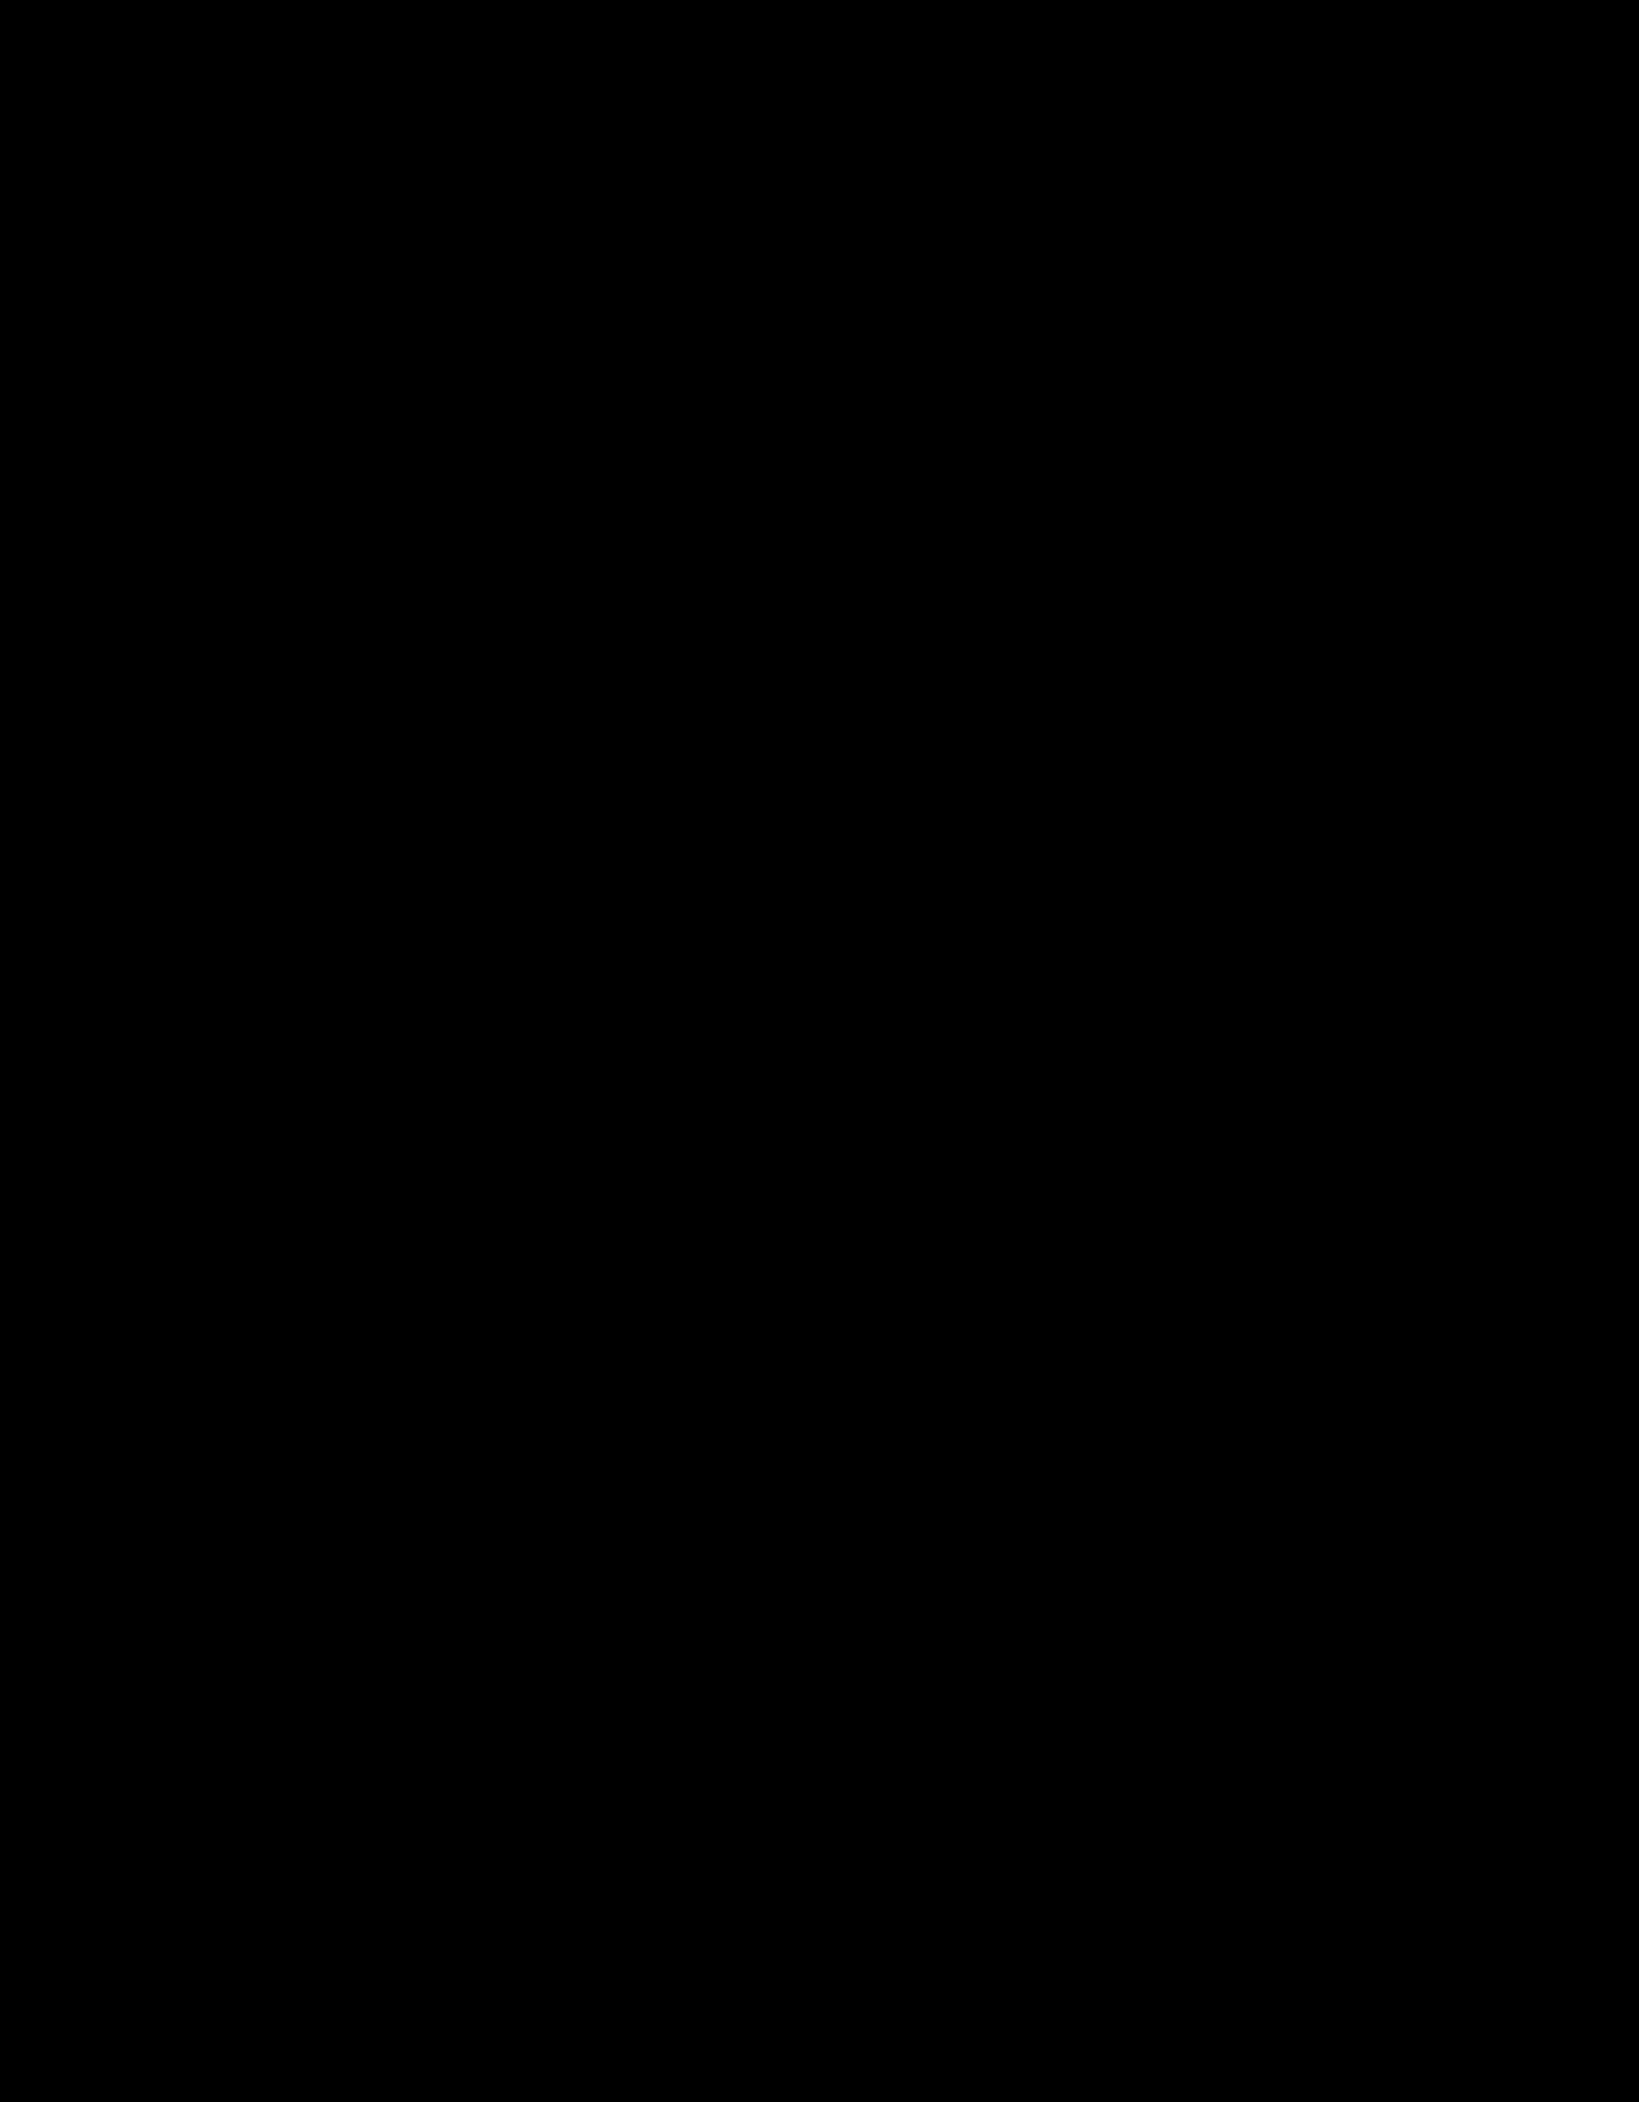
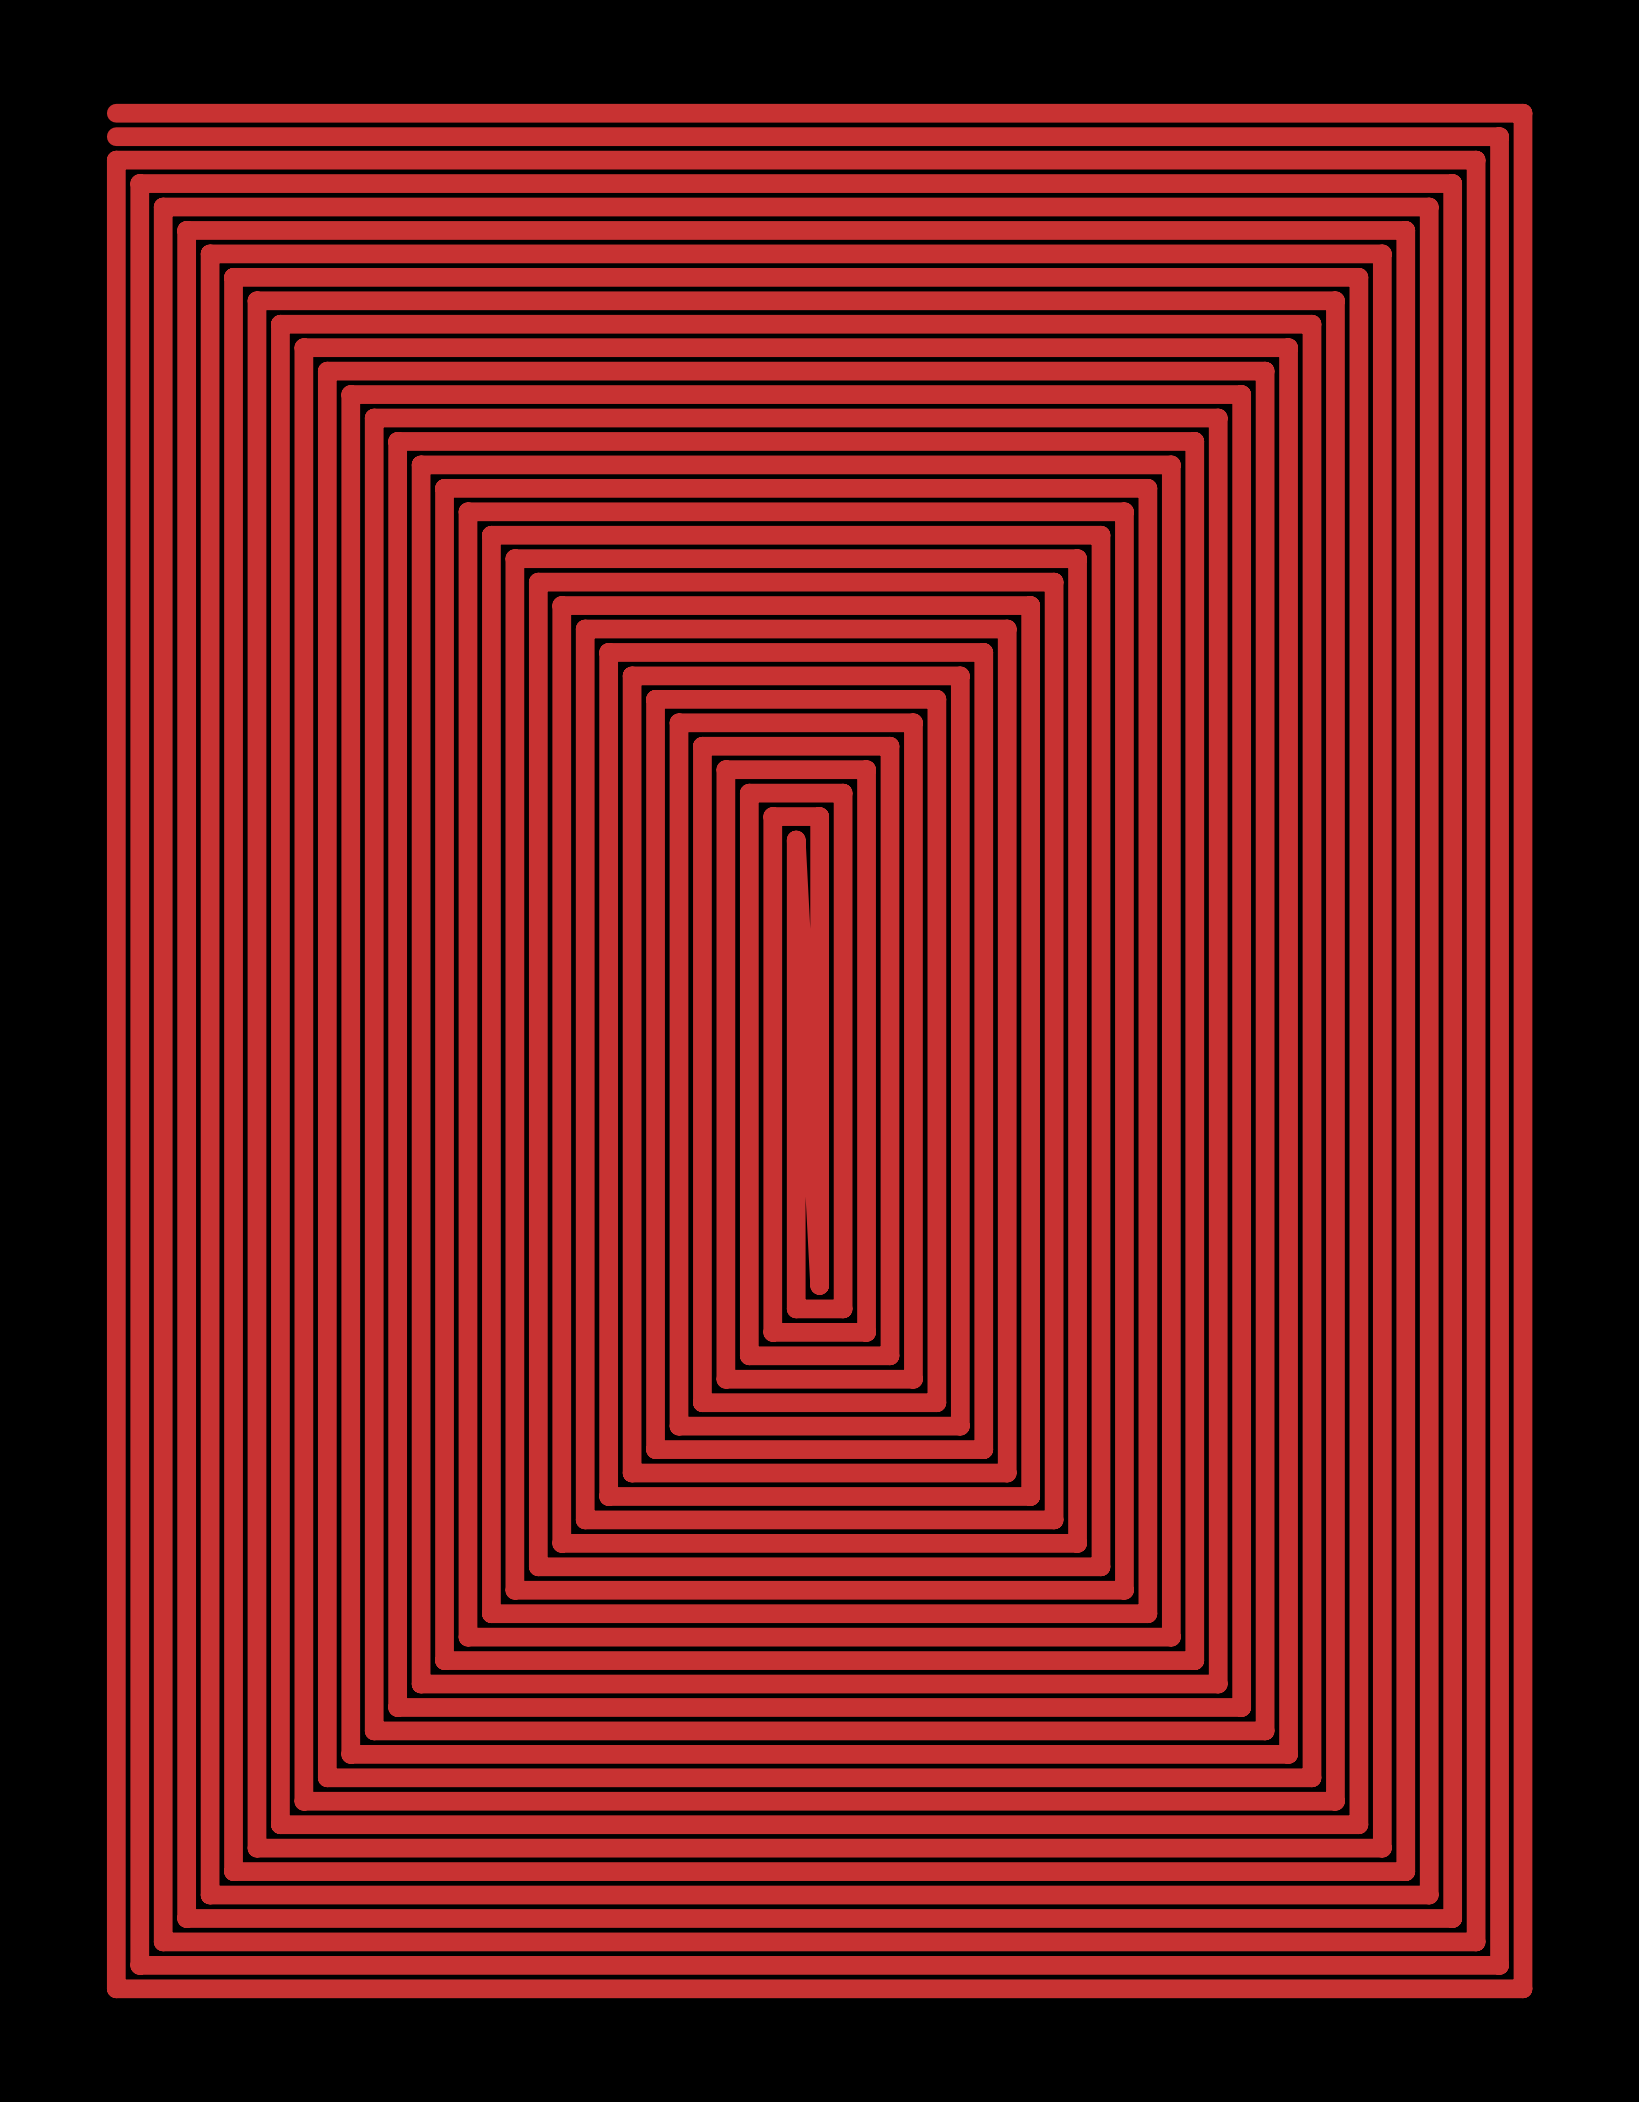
track: none -> (116, 113) (1522, 113) (1522, 1988) (116, 1988) (116, 160) (1476, 160) (1476, 1941) (163, 1941) (163, 207) (1429, 207) (1429, 1895) (210, 1895) (210, 253) (1382, 253) (1382, 1848) (256, 1848) (256, 300) (1335, 300) (1335, 1801) (303, 1801) (303, 347) (1288, 347) (1288, 1754) (350, 1754) (350, 394) (1241, 394) (1241, 1707) (397, 1707) (397, 441) (1194, 441) (1194, 1660) (444, 1660) (444, 488) (1147, 488) (1147, 1613) (491, 1613) (491, 535) (1100, 535) (1100, 1566) (538, 1566) (538, 582) (1054, 582) (1054, 1519) (585, 1519) (585, 629) (1007, 629) (1007, 1473) (632, 1473) (632, 675) (960, 675) (960, 1426) (678, 1426) (678, 722) (913, 722) (913, 1379) (725, 1379) (725, 769) (866, 769) (866, 1332) (772, 1332) (772, 816) (819, 816) (819, 1285) (796, 840) (796, 1308) (843, 1308) (843, 793) (749, 793) (749, 1355) (889, 1355) (889, 746) (702, 746) (702, 1402) (936, 1402) (936, 699) (655, 699) (655, 1449) (983, 1449) (983, 652) (608, 652) (608, 1496) (1030, 1496) (1030, 605) (561, 605) (561, 1543) (1077, 1543) (1077, 558) (514, 558) (514, 1590) (1124, 1590) (1124, 511) (467, 511) (467, 1637) (1171, 1637) (1171, 464) (421, 464) (421, 1684) (1218, 1684) (1218, 418) (374, 418) (374, 1730) (1265, 1730) (1265, 371) (327, 371) (327, 1777) (1311, 1777) (1311, 324) (280, 324) (280, 1824) (1358, 1824) (1358, 277) (233, 277) (233, 1871) (1405, 1871) (1405, 230) (186, 230) (186, 1918) (1452, 1918) (1452, 183) (139, 183) (139, 1965) (1499, 1965) (1499, 136) (116, 136)

